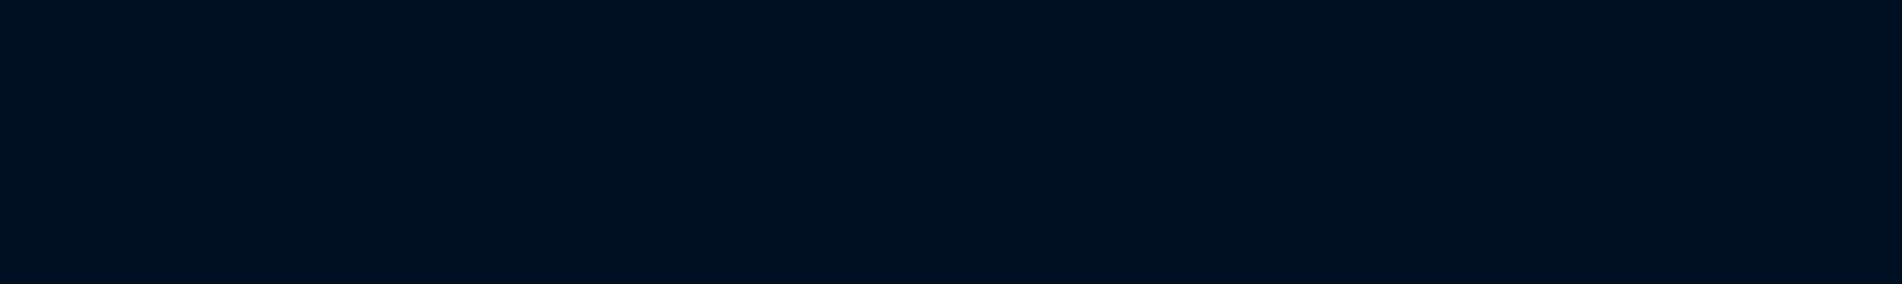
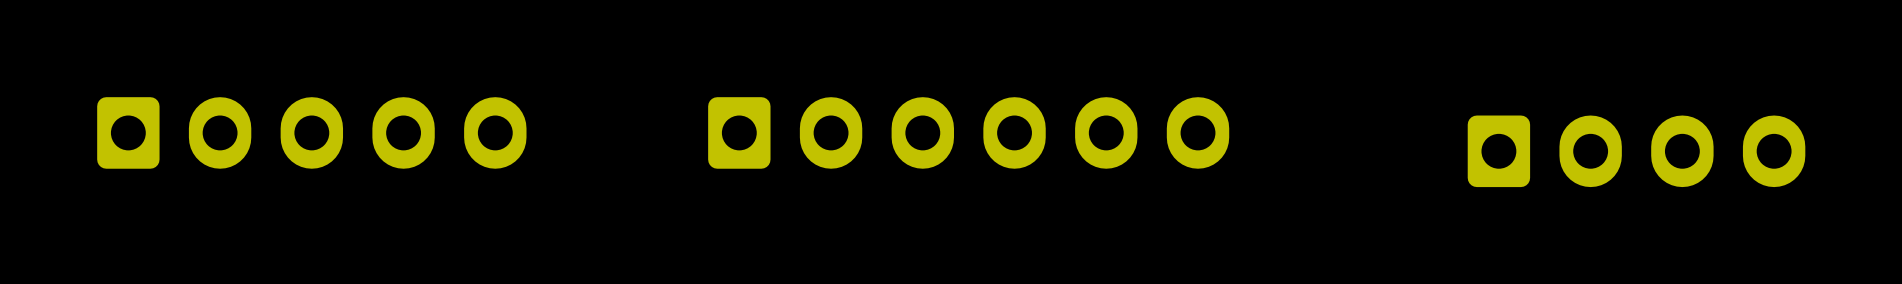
part: none -> (311, 132)
part: none -> (968, 132)
part: none -> (1636, 151)

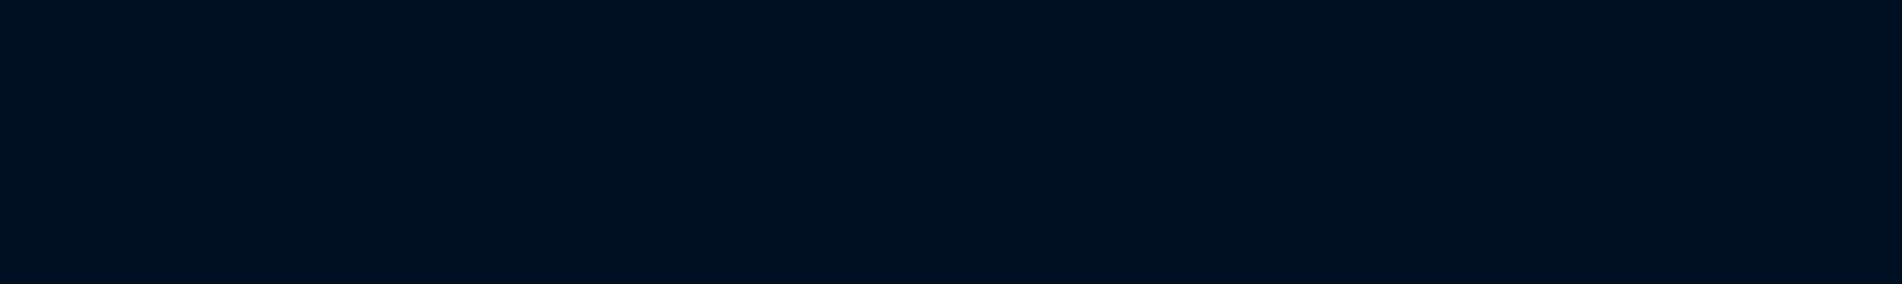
part: (311, 132) -> none
part: (968, 132) -> none
part: (1636, 151) -> none

